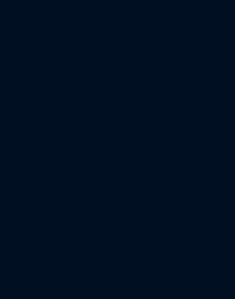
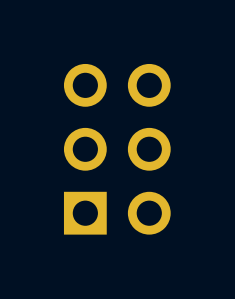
part: none -> (117, 149)

